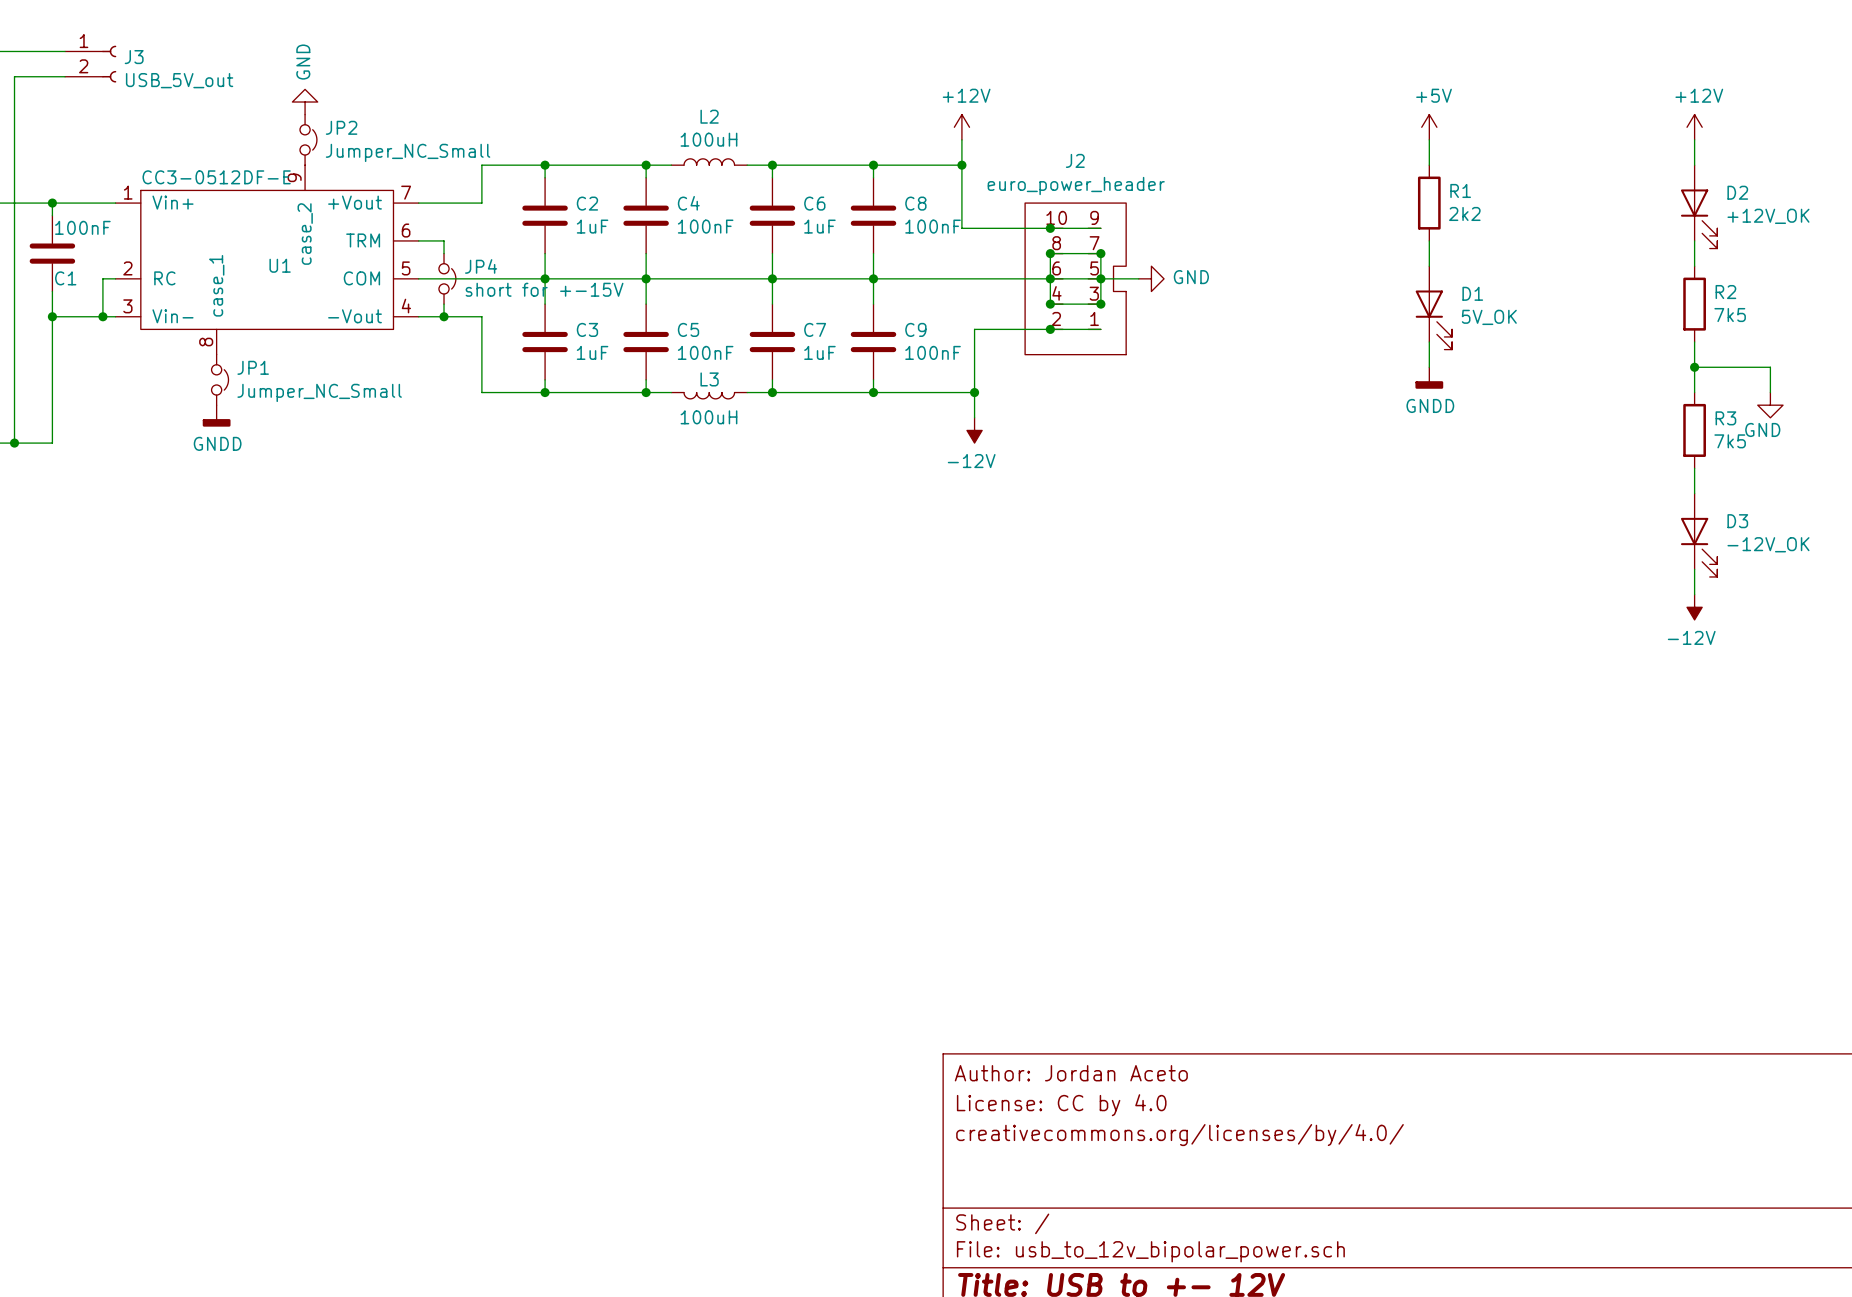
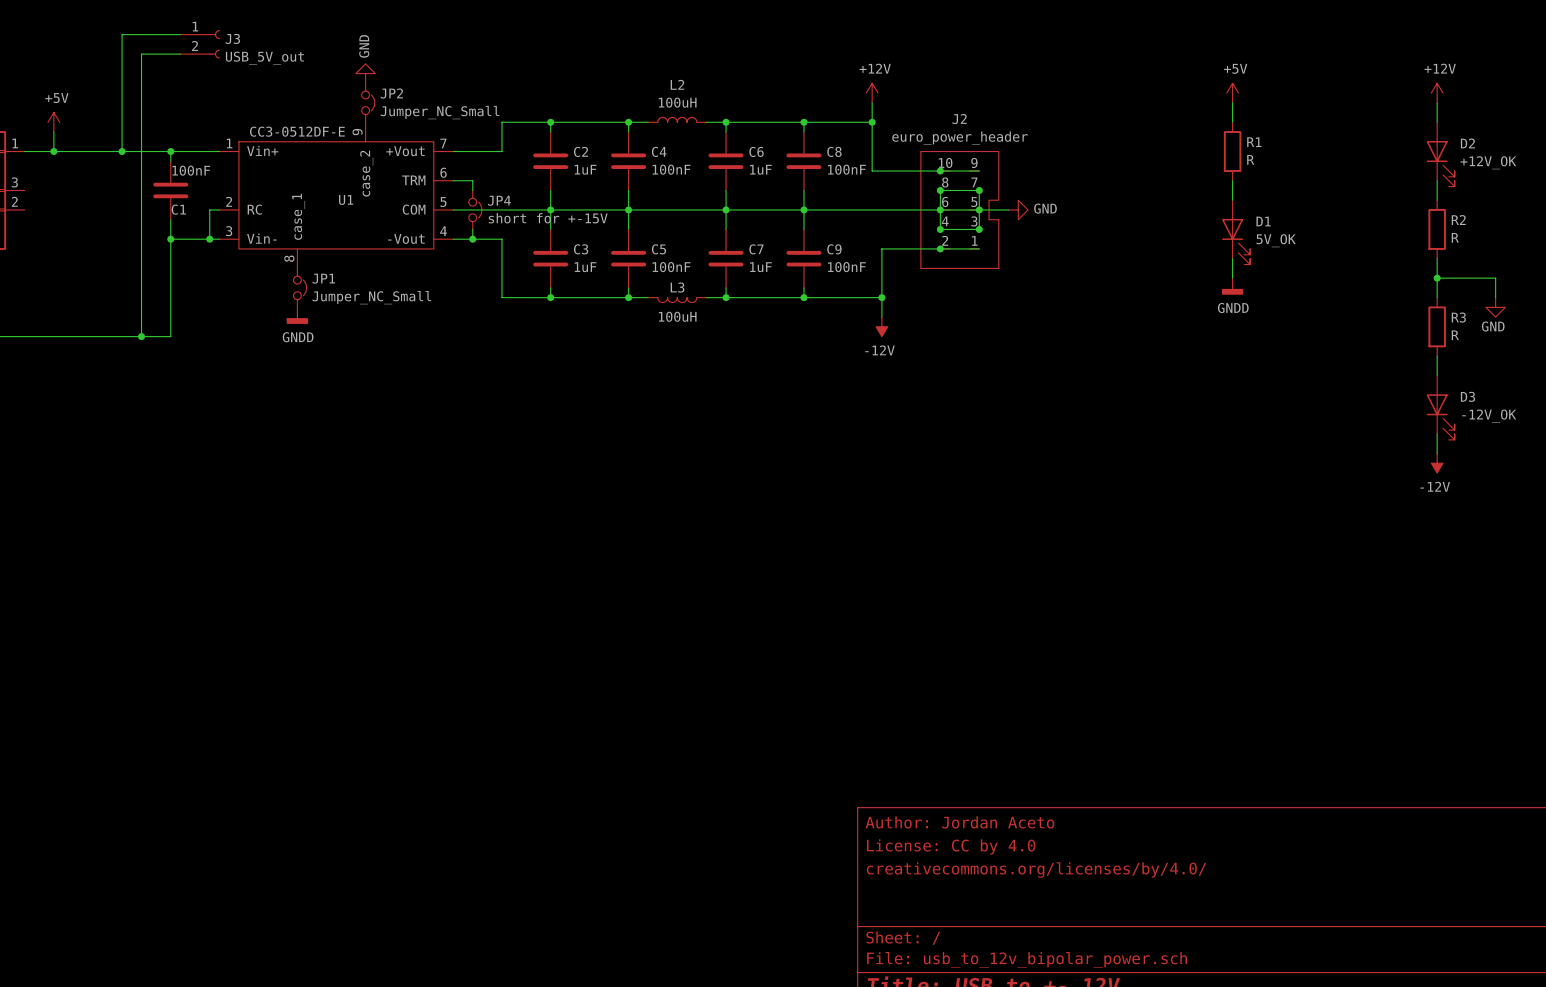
R1 value: 2k2 (1464, 213) -> R (1250, 159)
R2 value: 7k5 (1730, 315) -> R (1455, 237)
R3 value: 7k5 (1730, 441) -> R (1455, 335)

